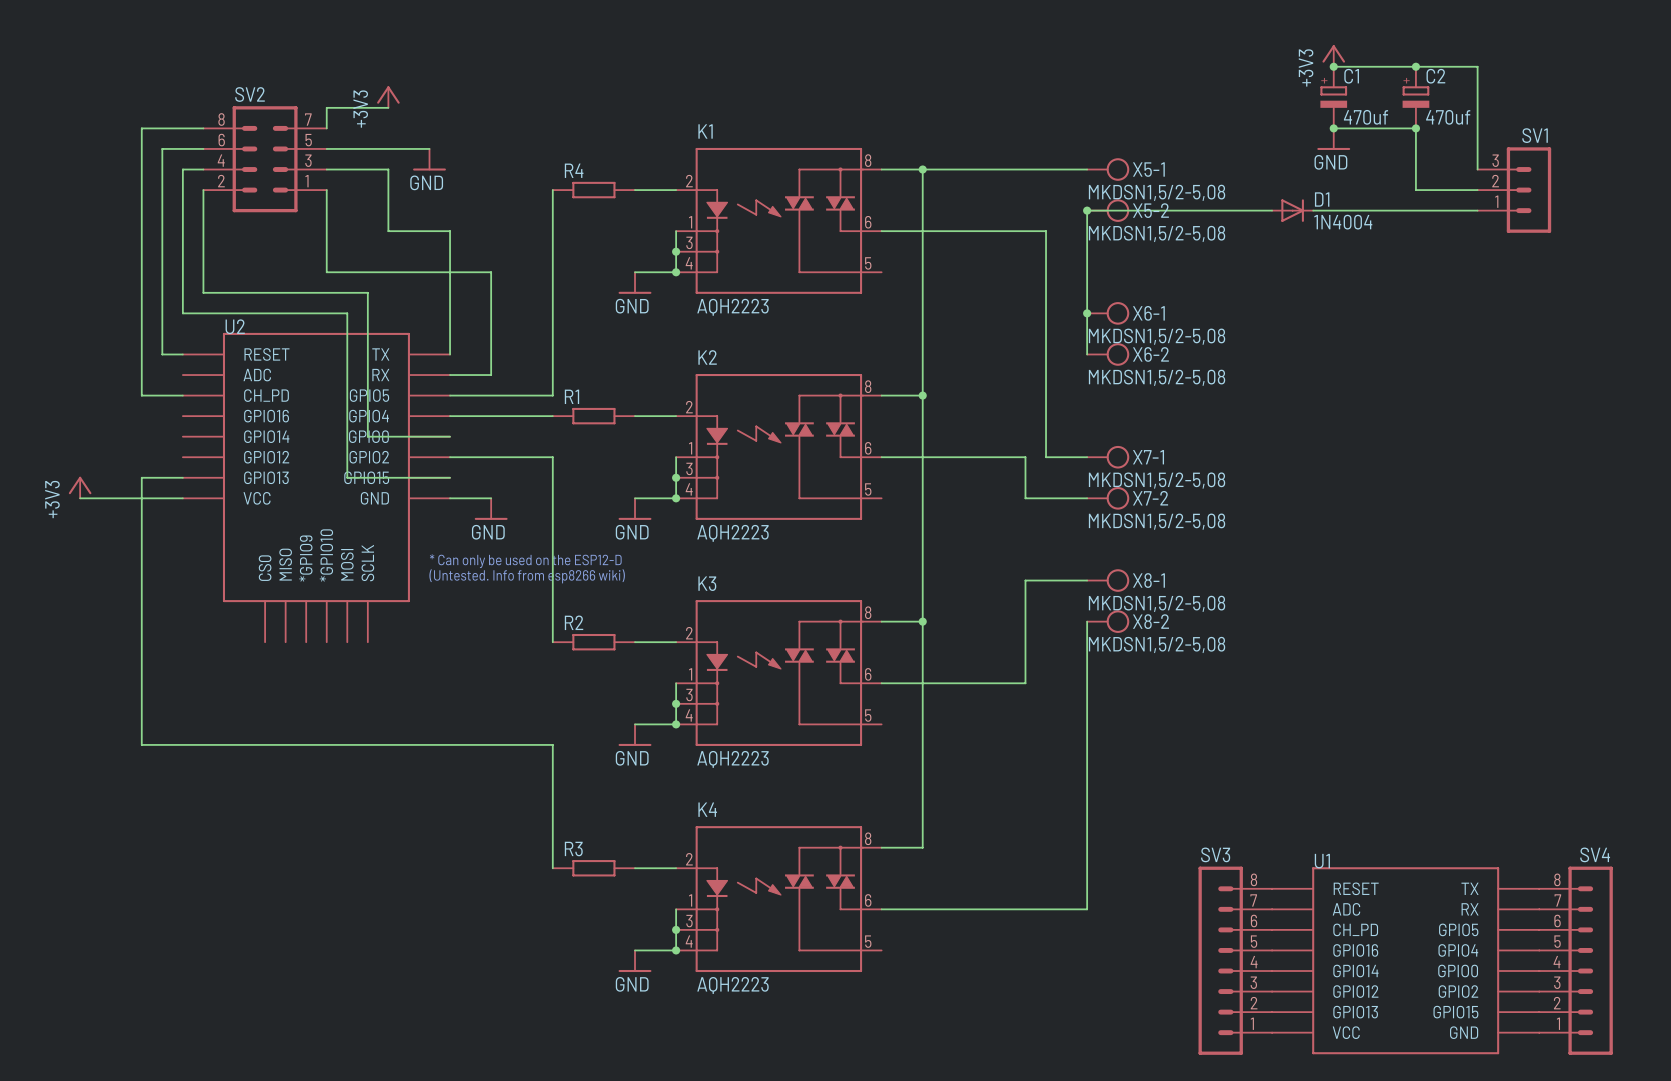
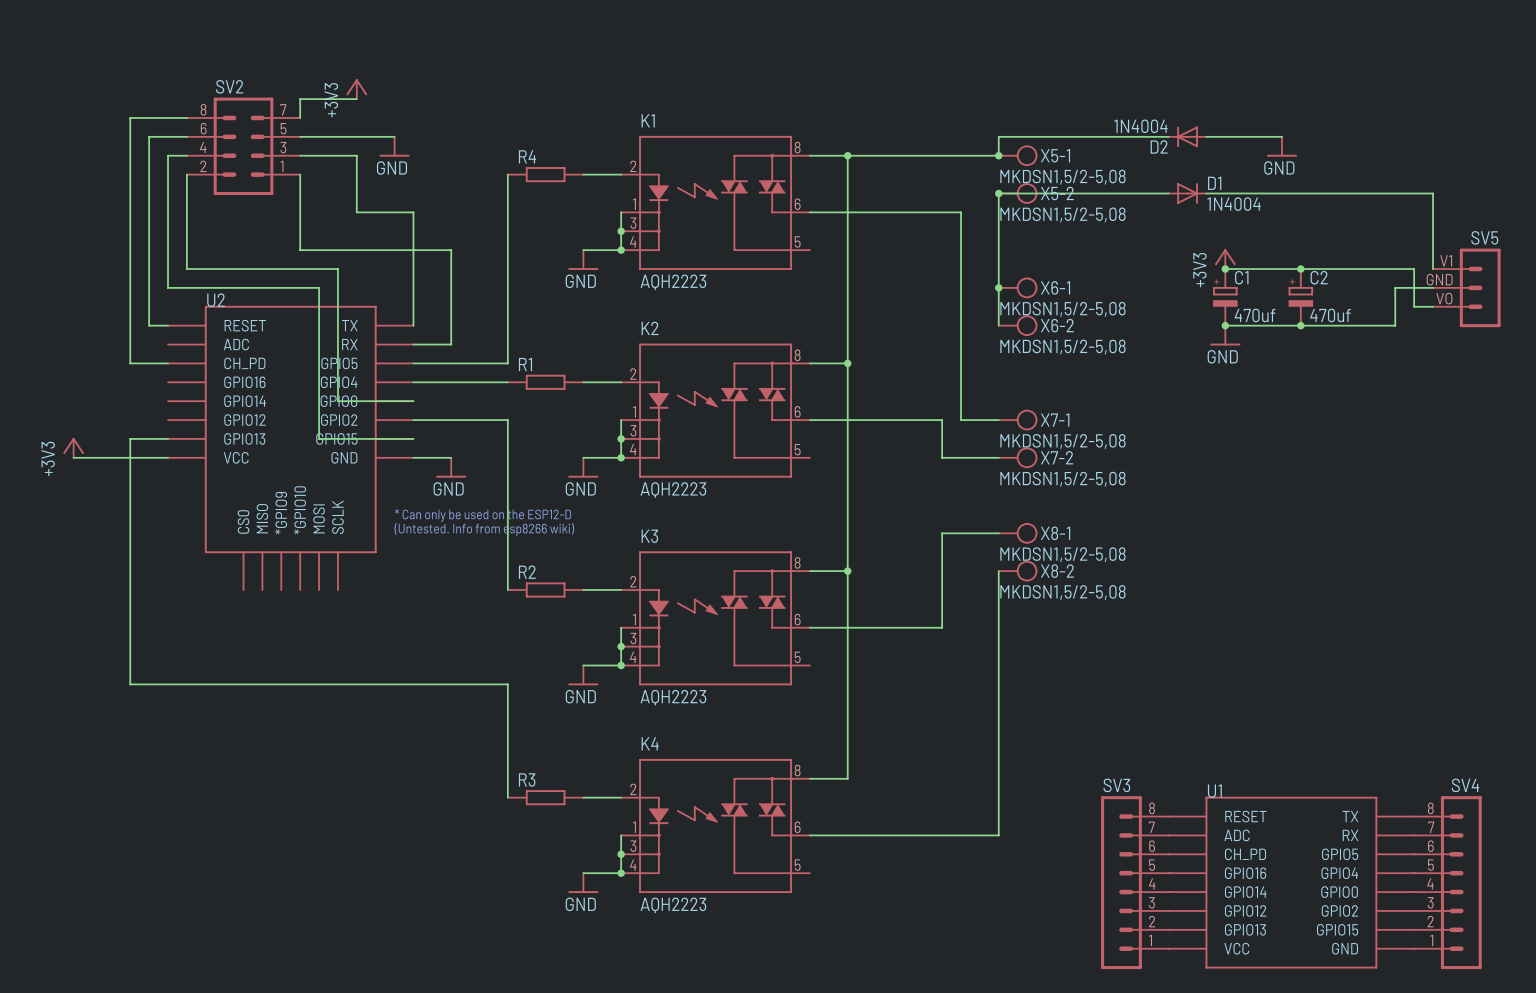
power symbol: +3V3 (1333, 55) -> none
wire: (1333, 66) (1477, 66) (1477, 169) -> none
junction: (1333, 66) -> none
junction: (1415, 66) -> none
C1 position: (1333, 97) -> (1225, 297)
C2 position: (1415, 97) -> (1300, 297)
wire: (1333, 128) (1415, 128) (1415, 190) (1477, 190) -> none
junction: (1333, 128) -> none
junction: (1415, 128) -> none
power symbol position: GND (1333, 139) -> GND (1281, 146)
wire: none -> (1168, 136) (998, 136) (998, 155)
D2: none -> 1N4004 (1187, 136)
wire: none -> (1206, 136) (1281, 136)
junction: none -> (998, 155)
SV1: (1514, 190) -> none
wire: none -> (1357, 193) (1433, 193) (1433, 269)
power symbol: none -> +3V3 (1225, 259)
wire: none -> (1225, 269) (1414, 269) (1414, 306) (1433, 306)
junction: none -> (1225, 269)
junction: none -> (1300, 269)
wire: none -> (1433, 287) (1395, 287) (1395, 325) (1225, 325)
SV5: none -> (1466, 287)
junction: none -> (1225, 325)
junction: none -> (1300, 325)
power symbol: none -> GND (1225, 335)

